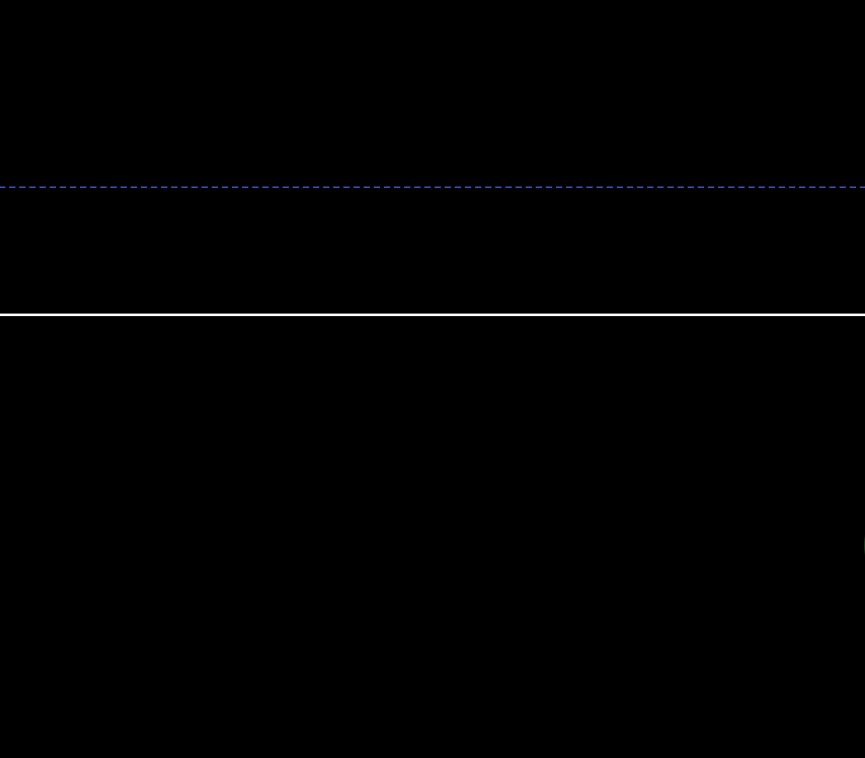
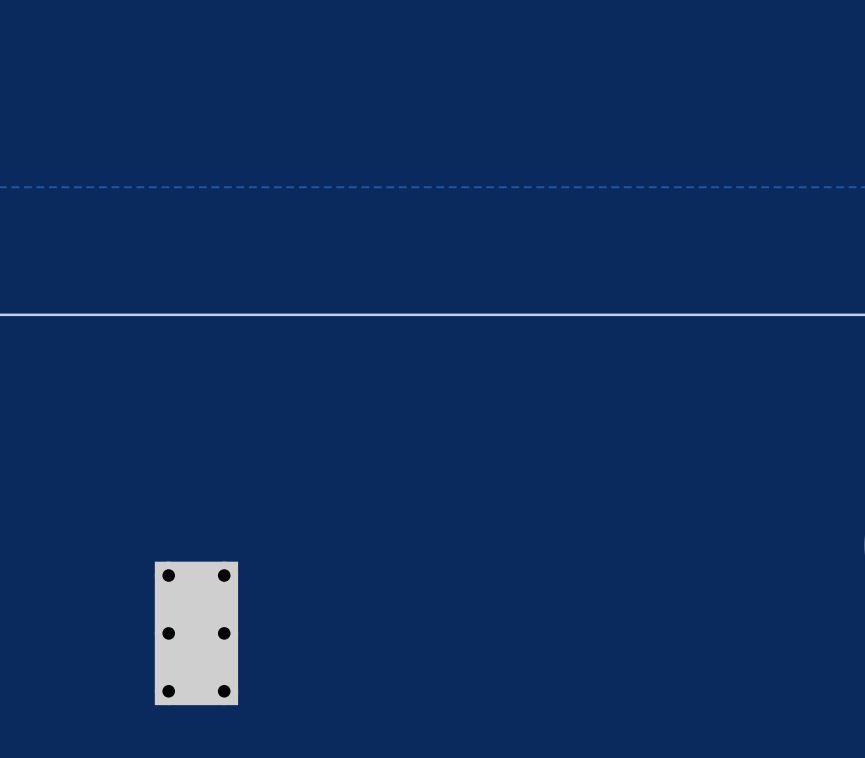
part: none -> (196, 633)

